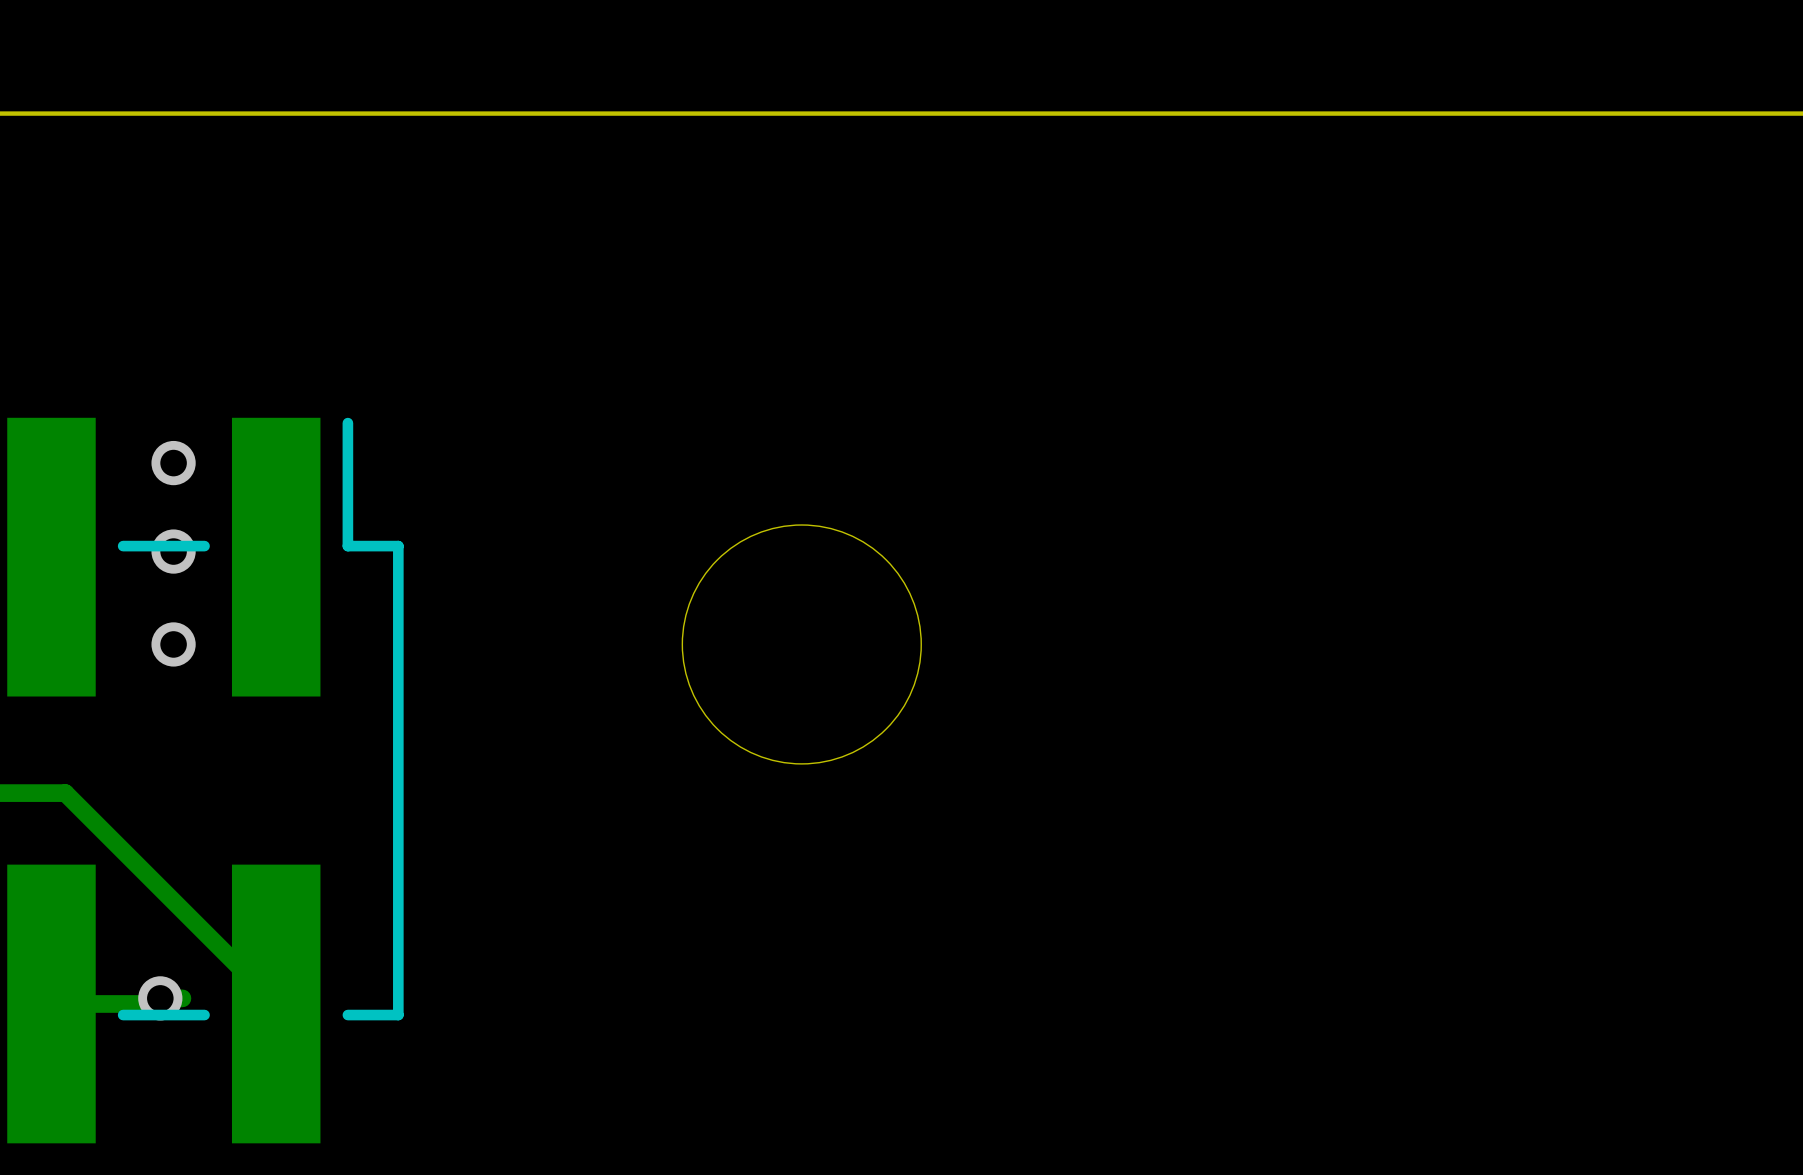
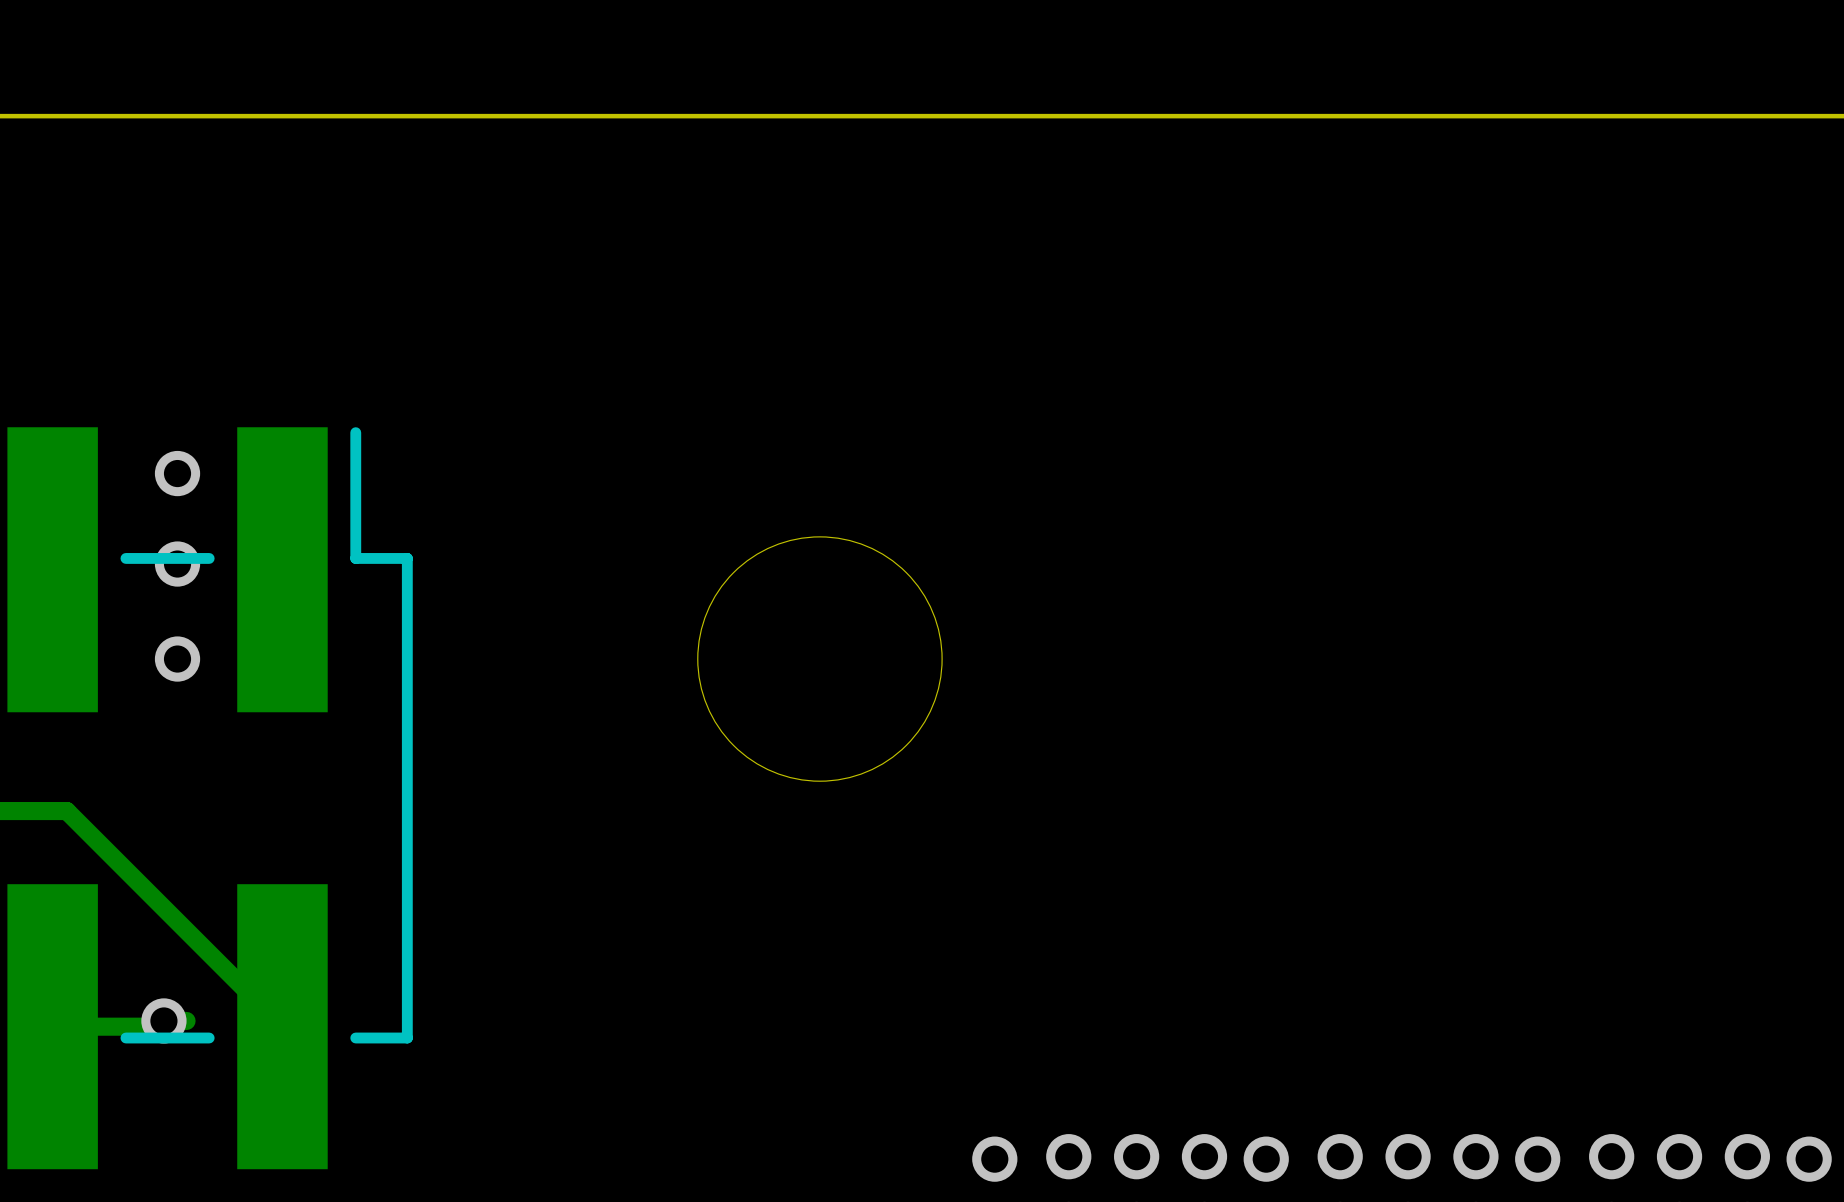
via: none -> (1068, 1156)
via: none -> (1136, 1156)
via: none -> (1204, 1156)
via: none -> (1340, 1156)
via: none -> (1408, 1156)
via: none -> (1475, 1156)
via: none -> (1611, 1156)
via: none -> (1679, 1156)
via: none -> (1747, 1156)
via: none -> (994, 1159)
via: none -> (1266, 1159)
via: none -> (1537, 1159)
via: none -> (1809, 1159)

